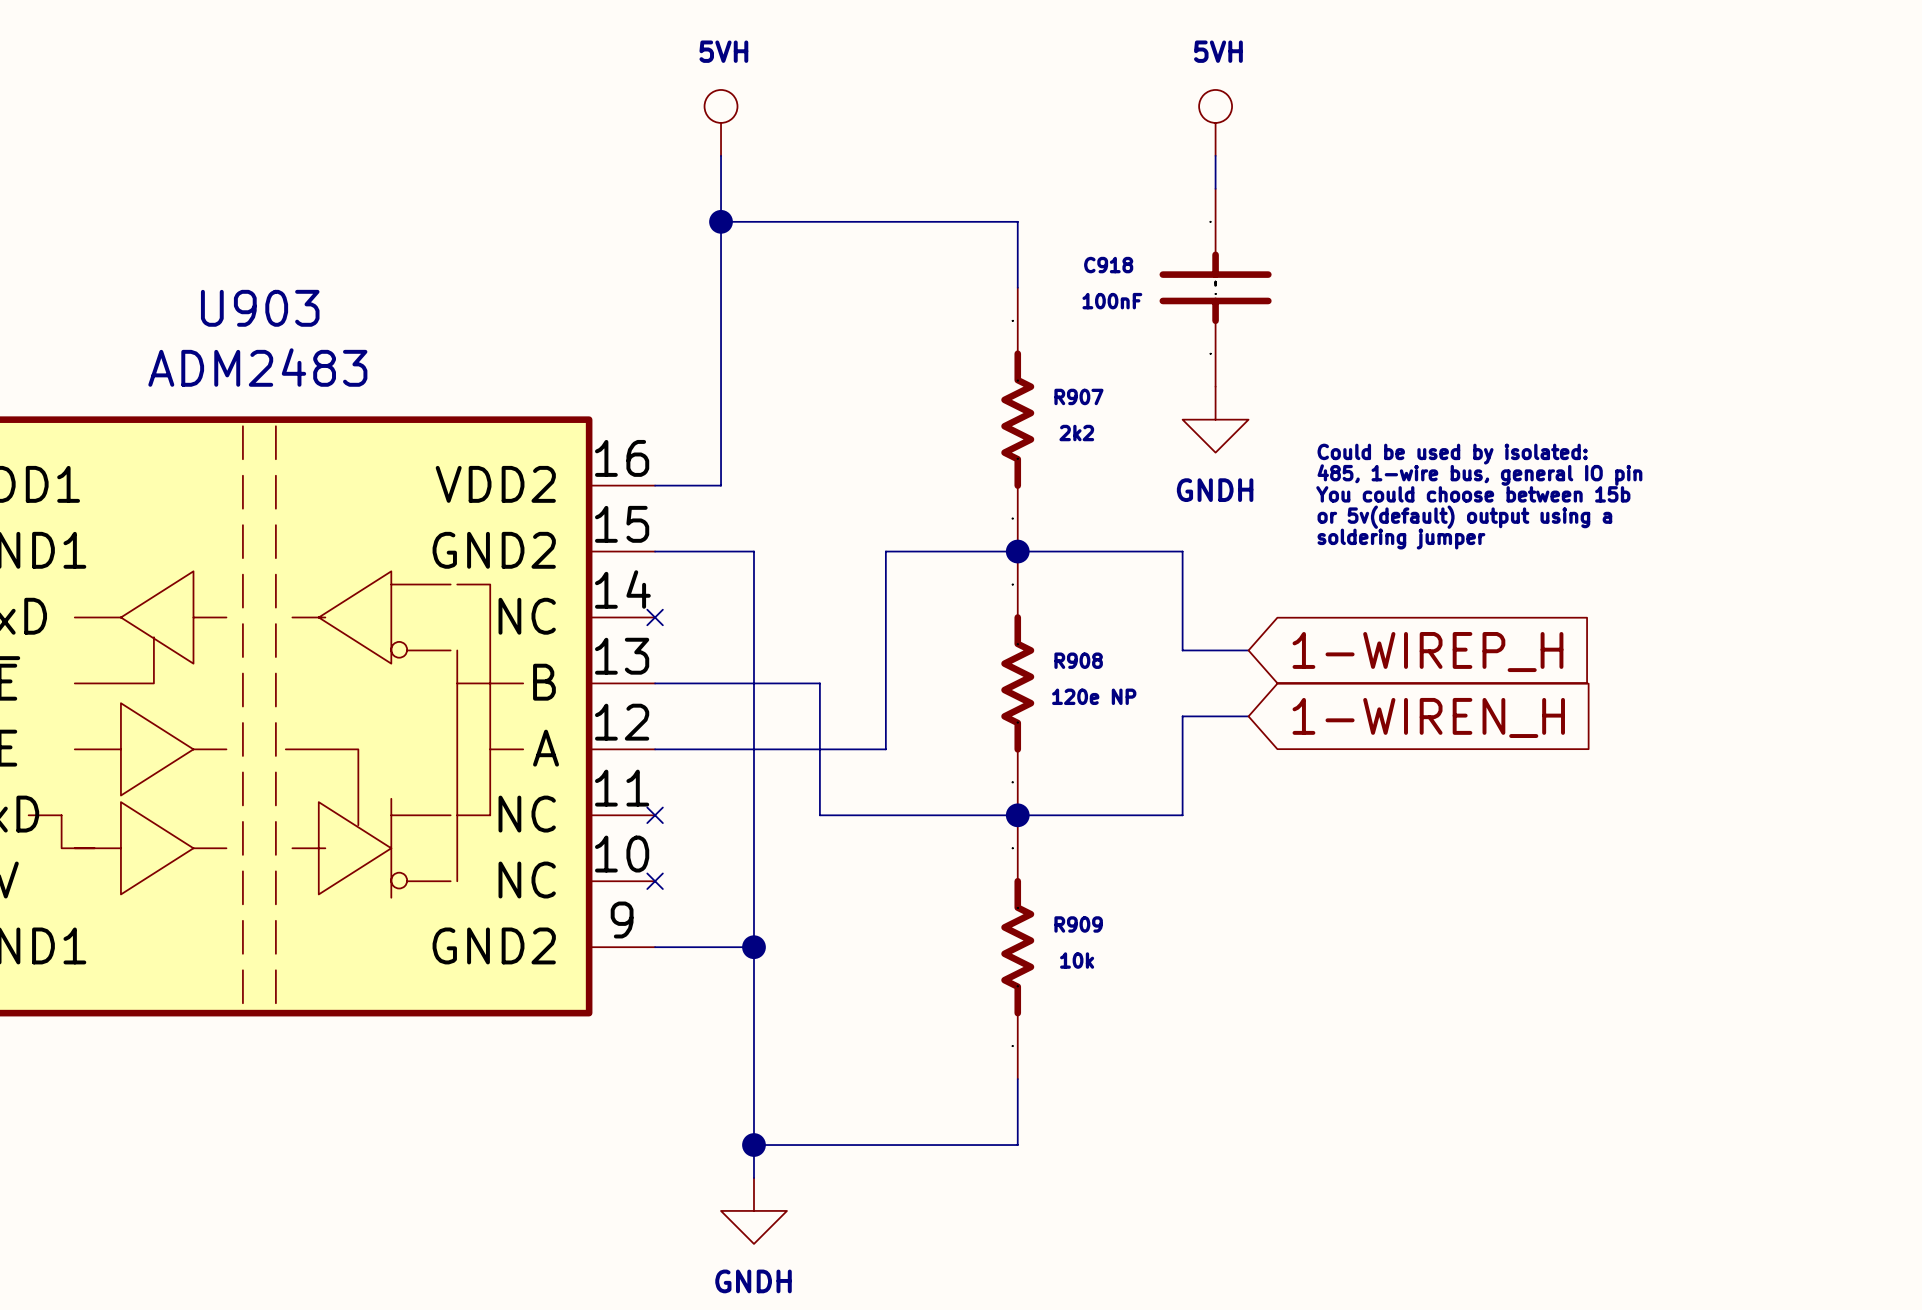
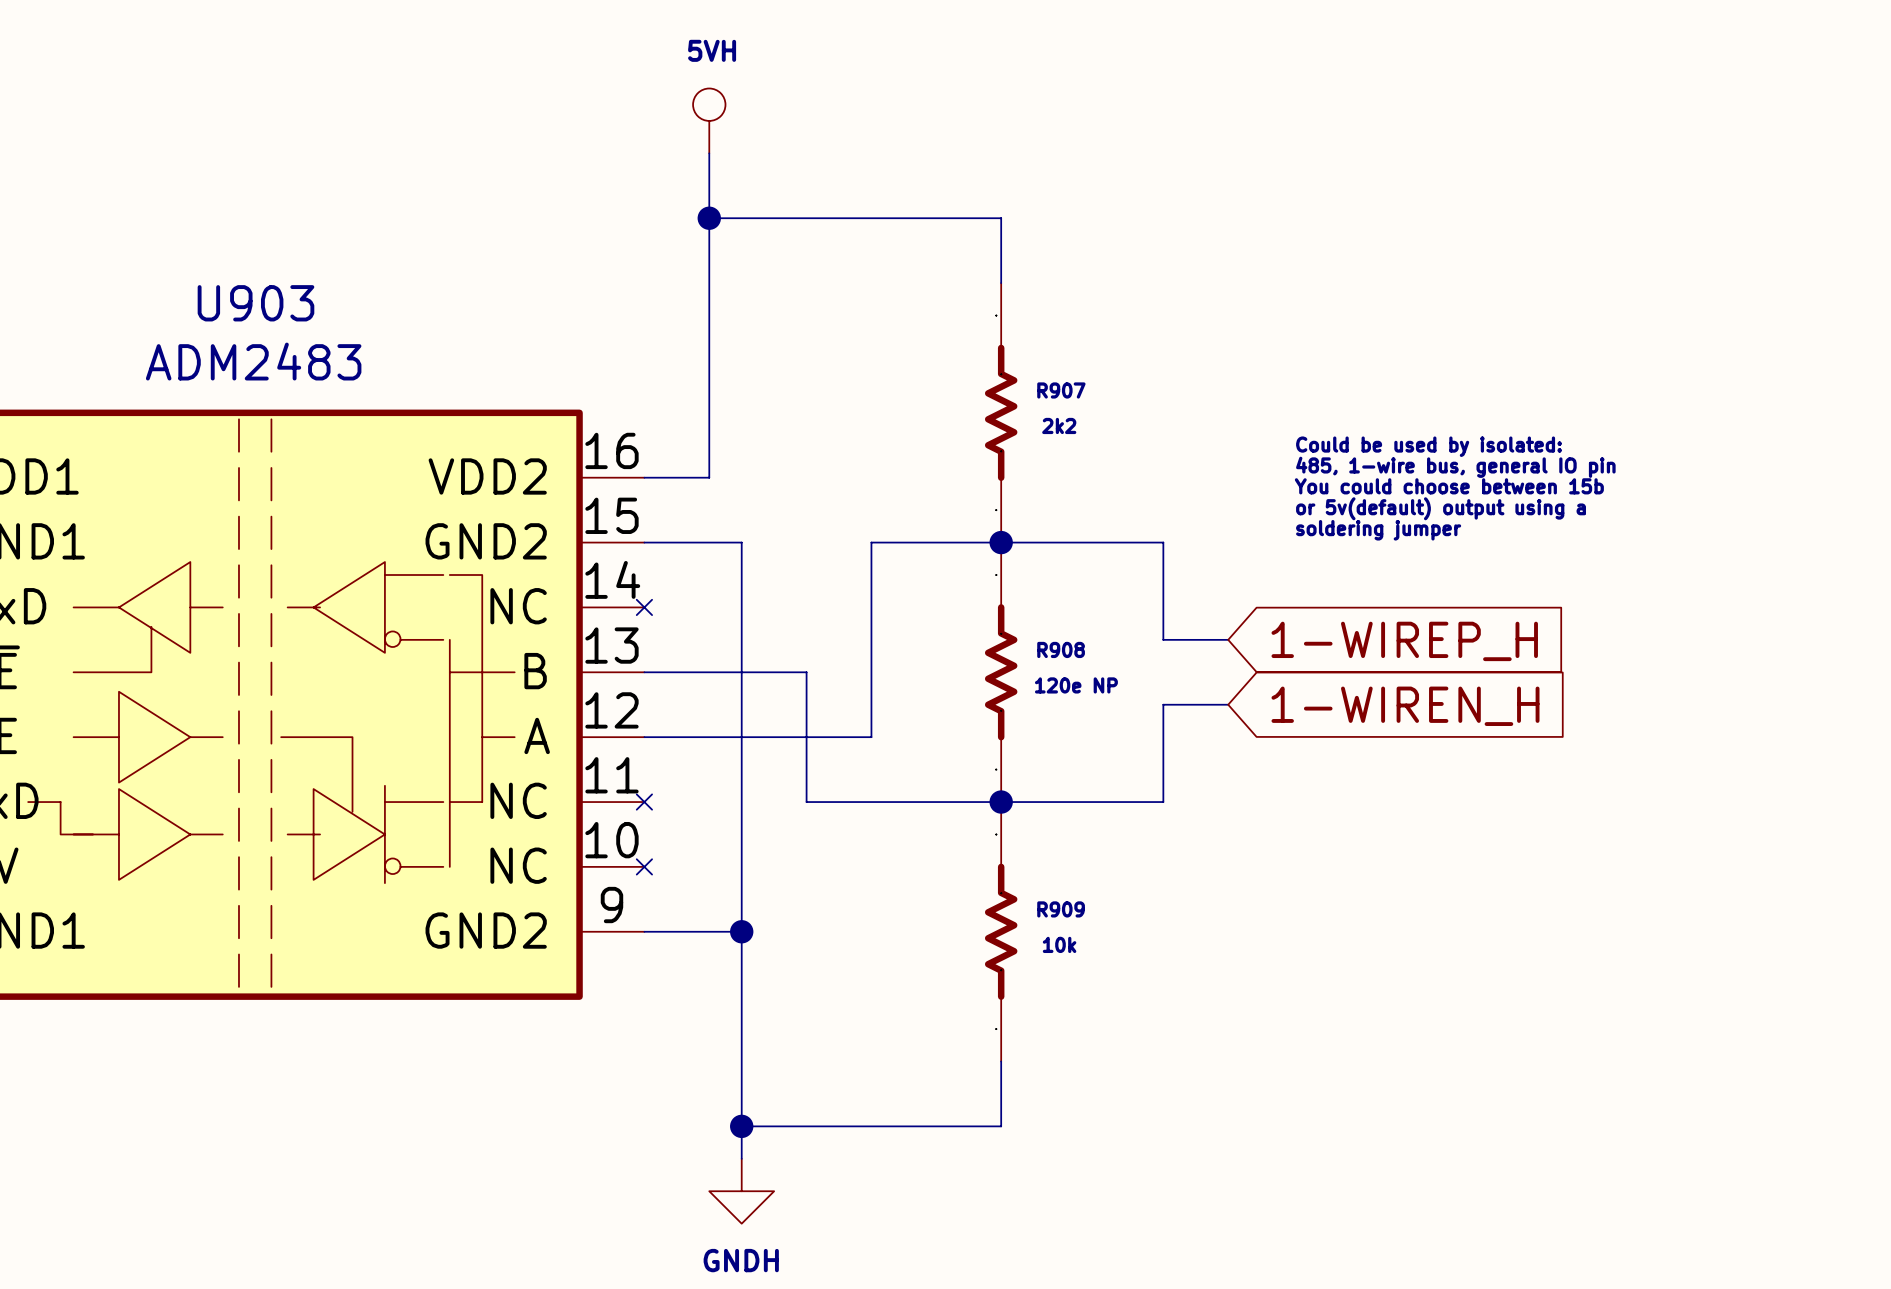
power symbol: 5VH (1215, 122) -> none
wire: (1215, 155) (1215, 188) -> none
C918: 100nF (1215, 287) -> none
power symbol: GNDH (1215, 419) -> none

